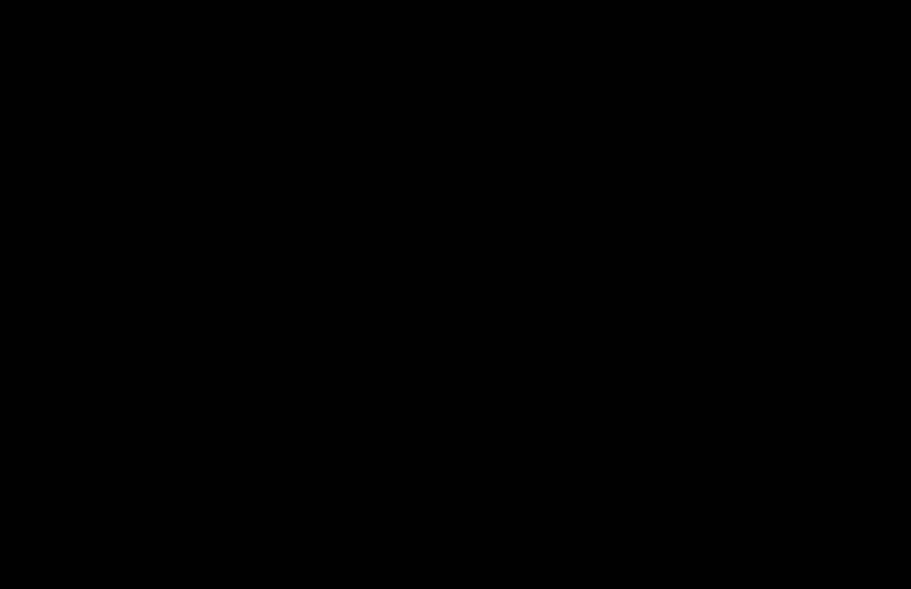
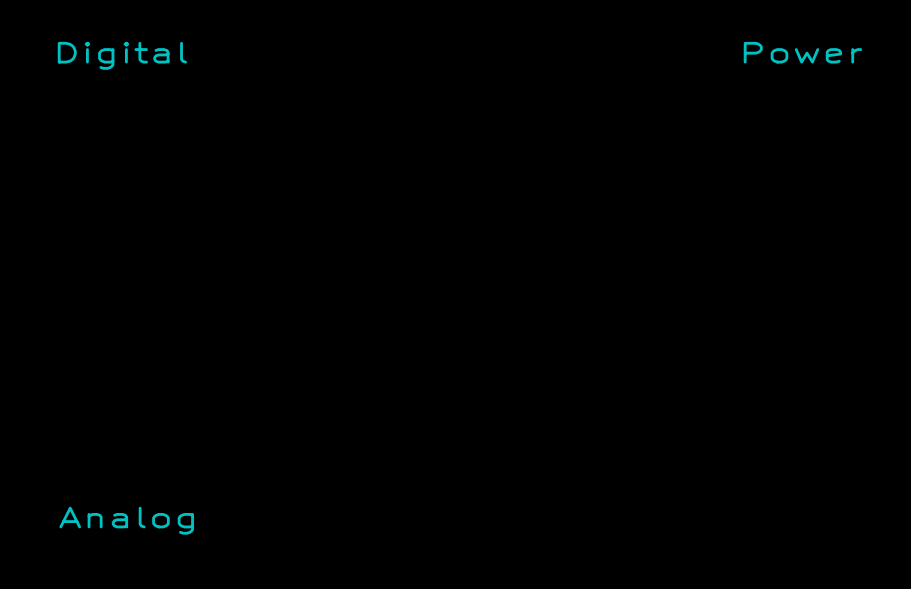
text: none -> Power (802, 52)
text: none -> Digital (122, 55)
text: none -> Analog (126, 520)

